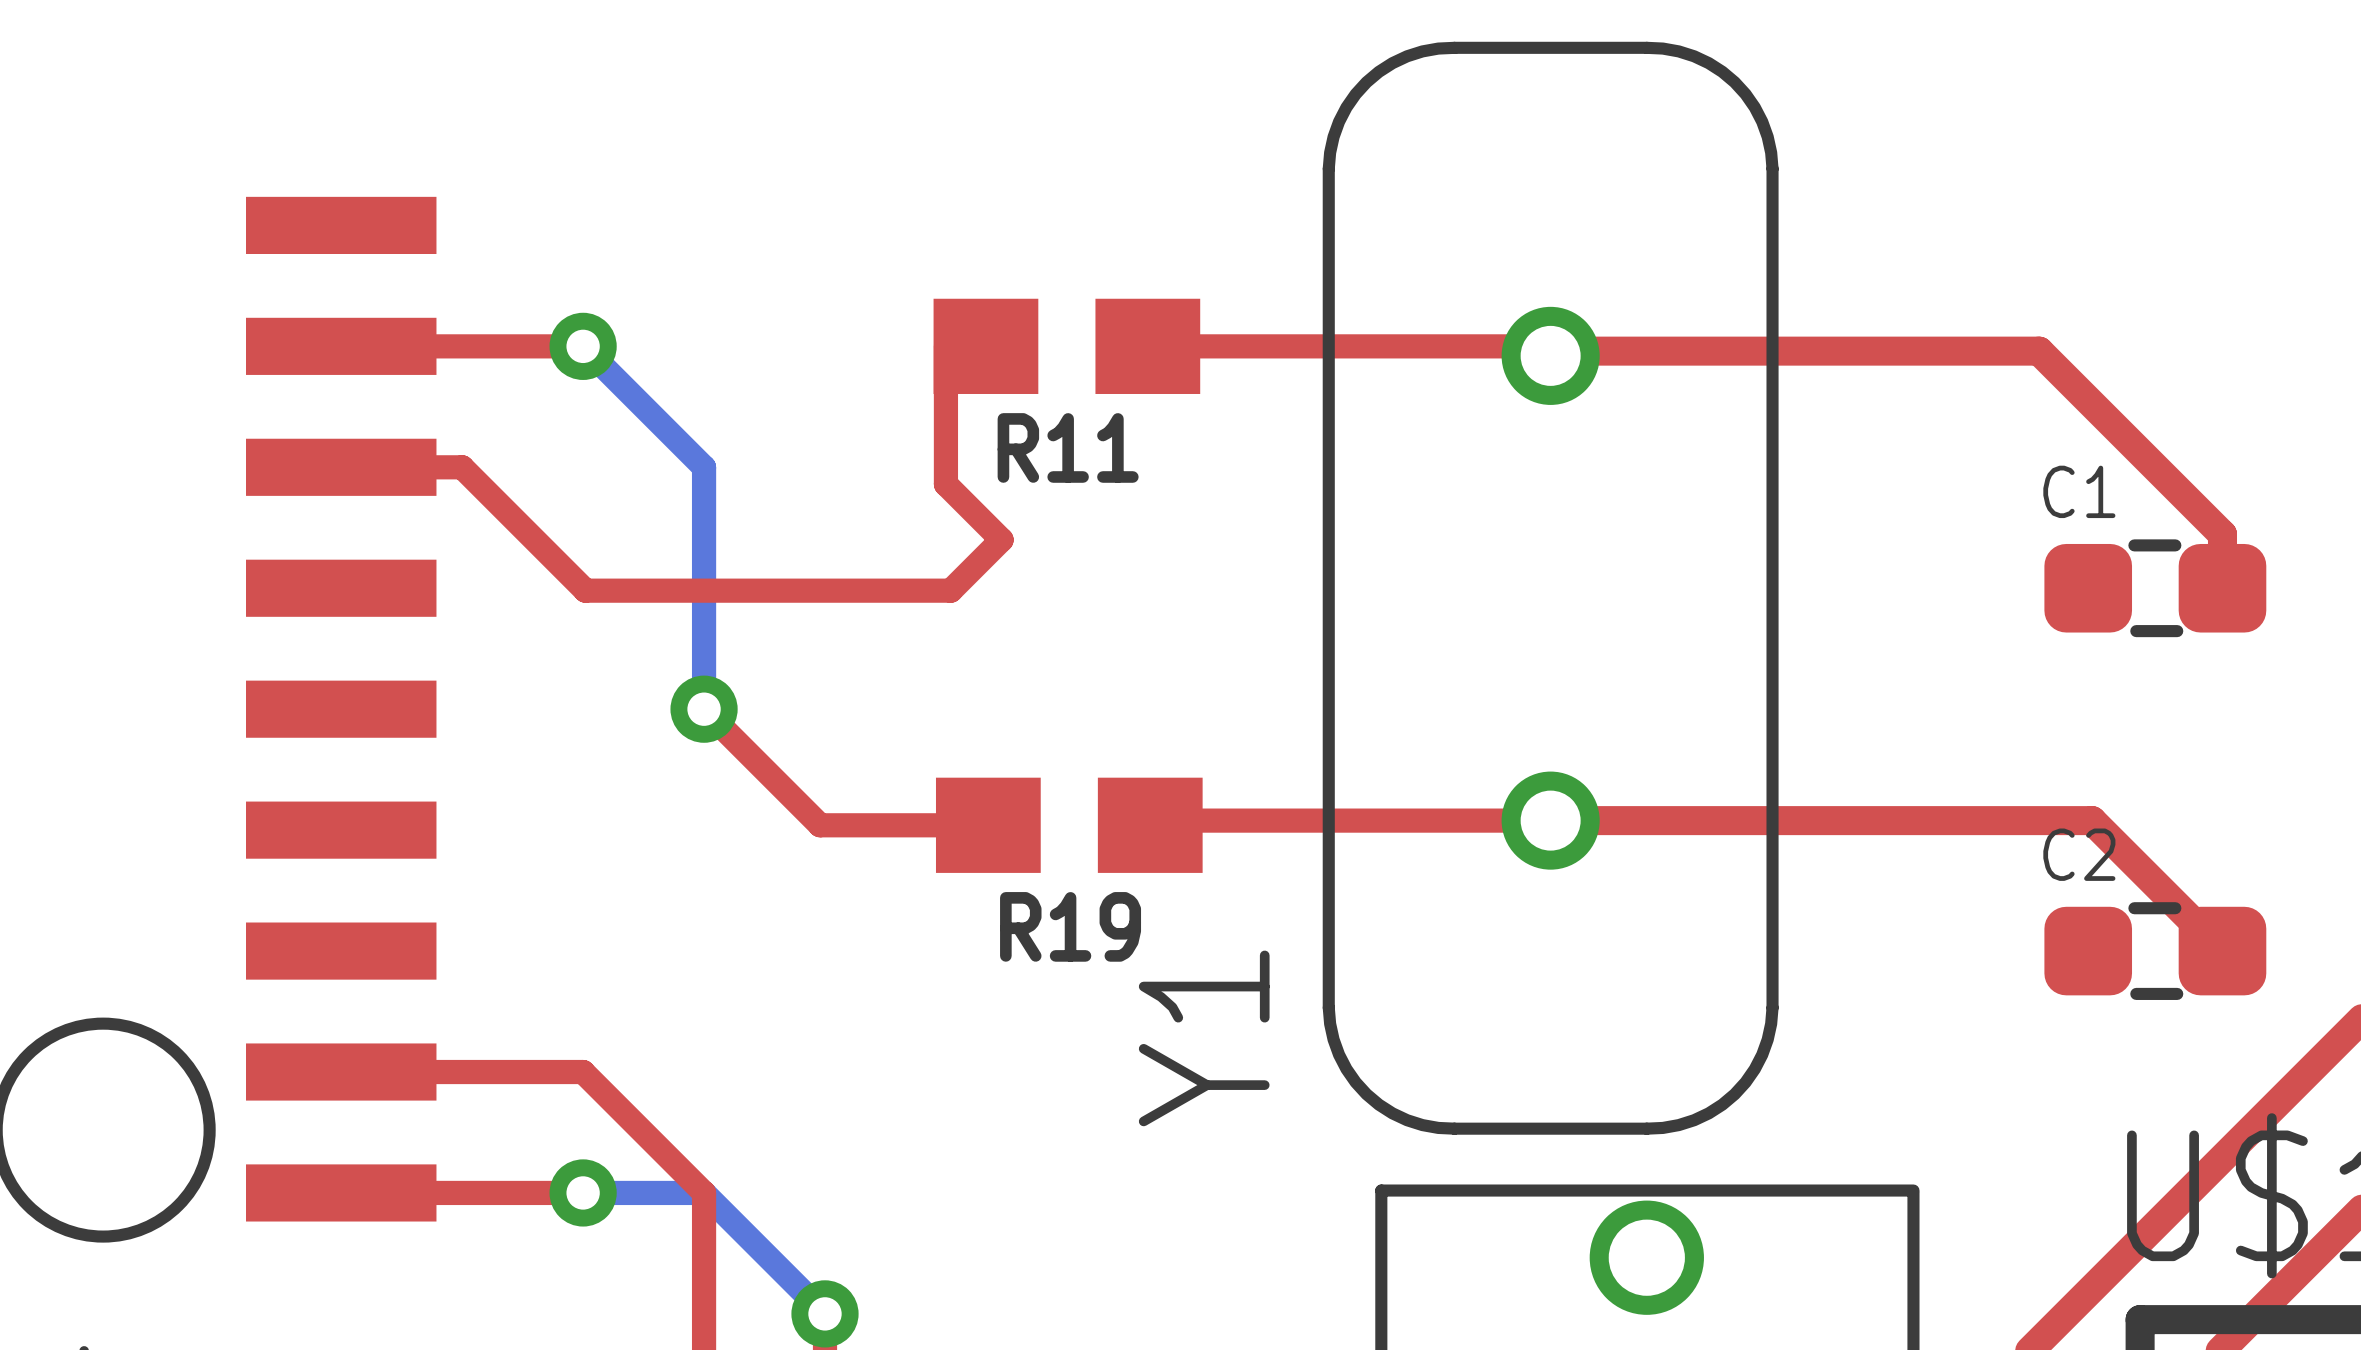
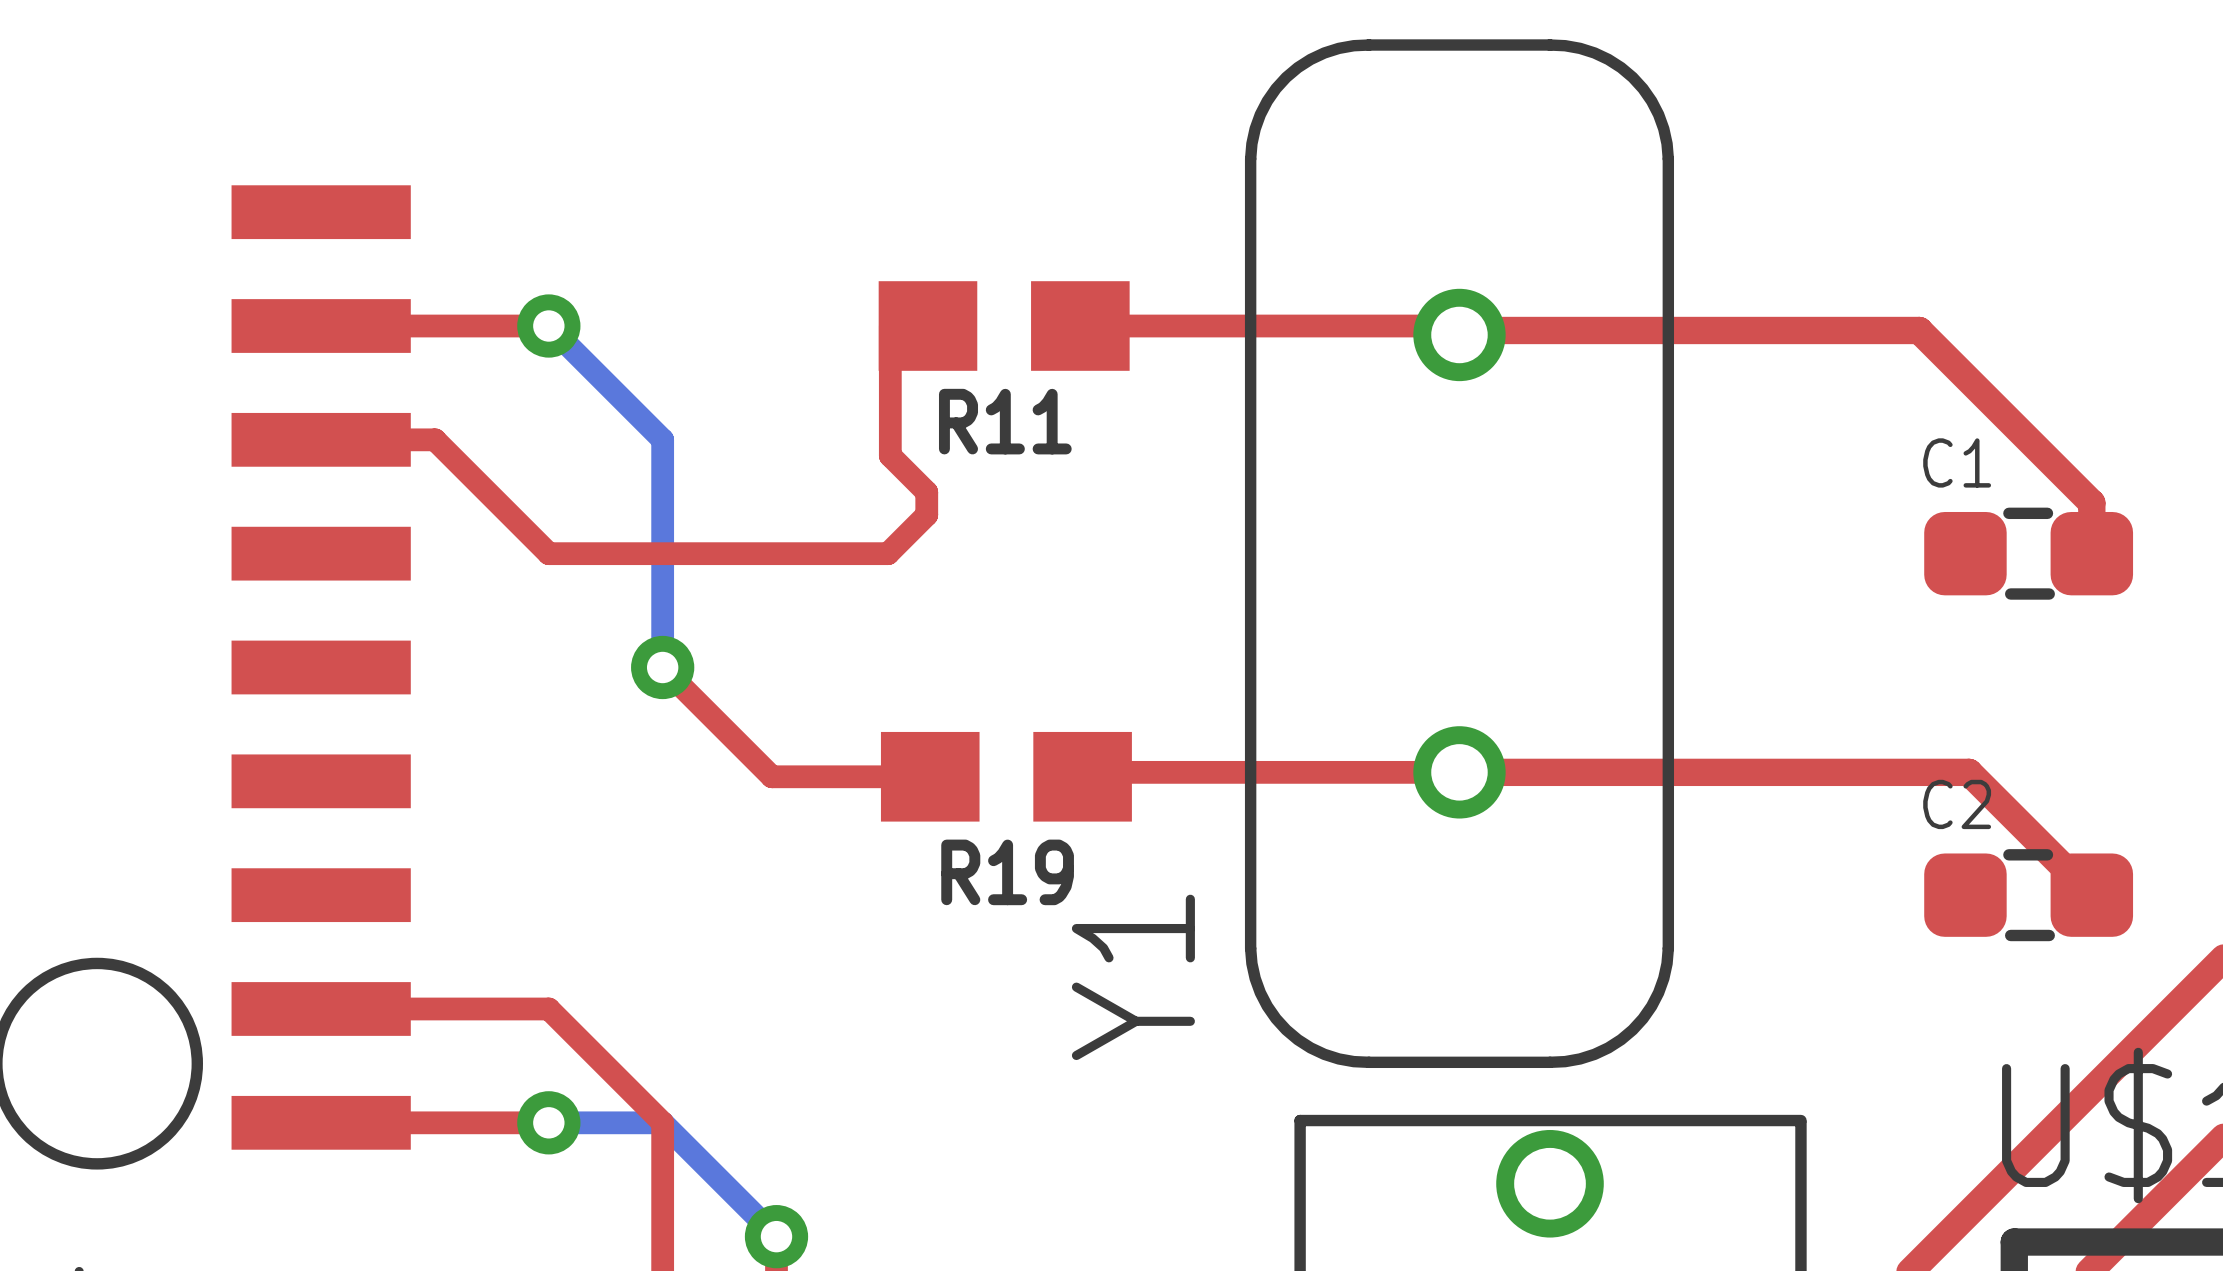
top track: (984, 522) (1001, 539) (950, 590) (585, 590) (583, 588) -> (926, 492) (926, 514) (888, 553) (548, 553)

